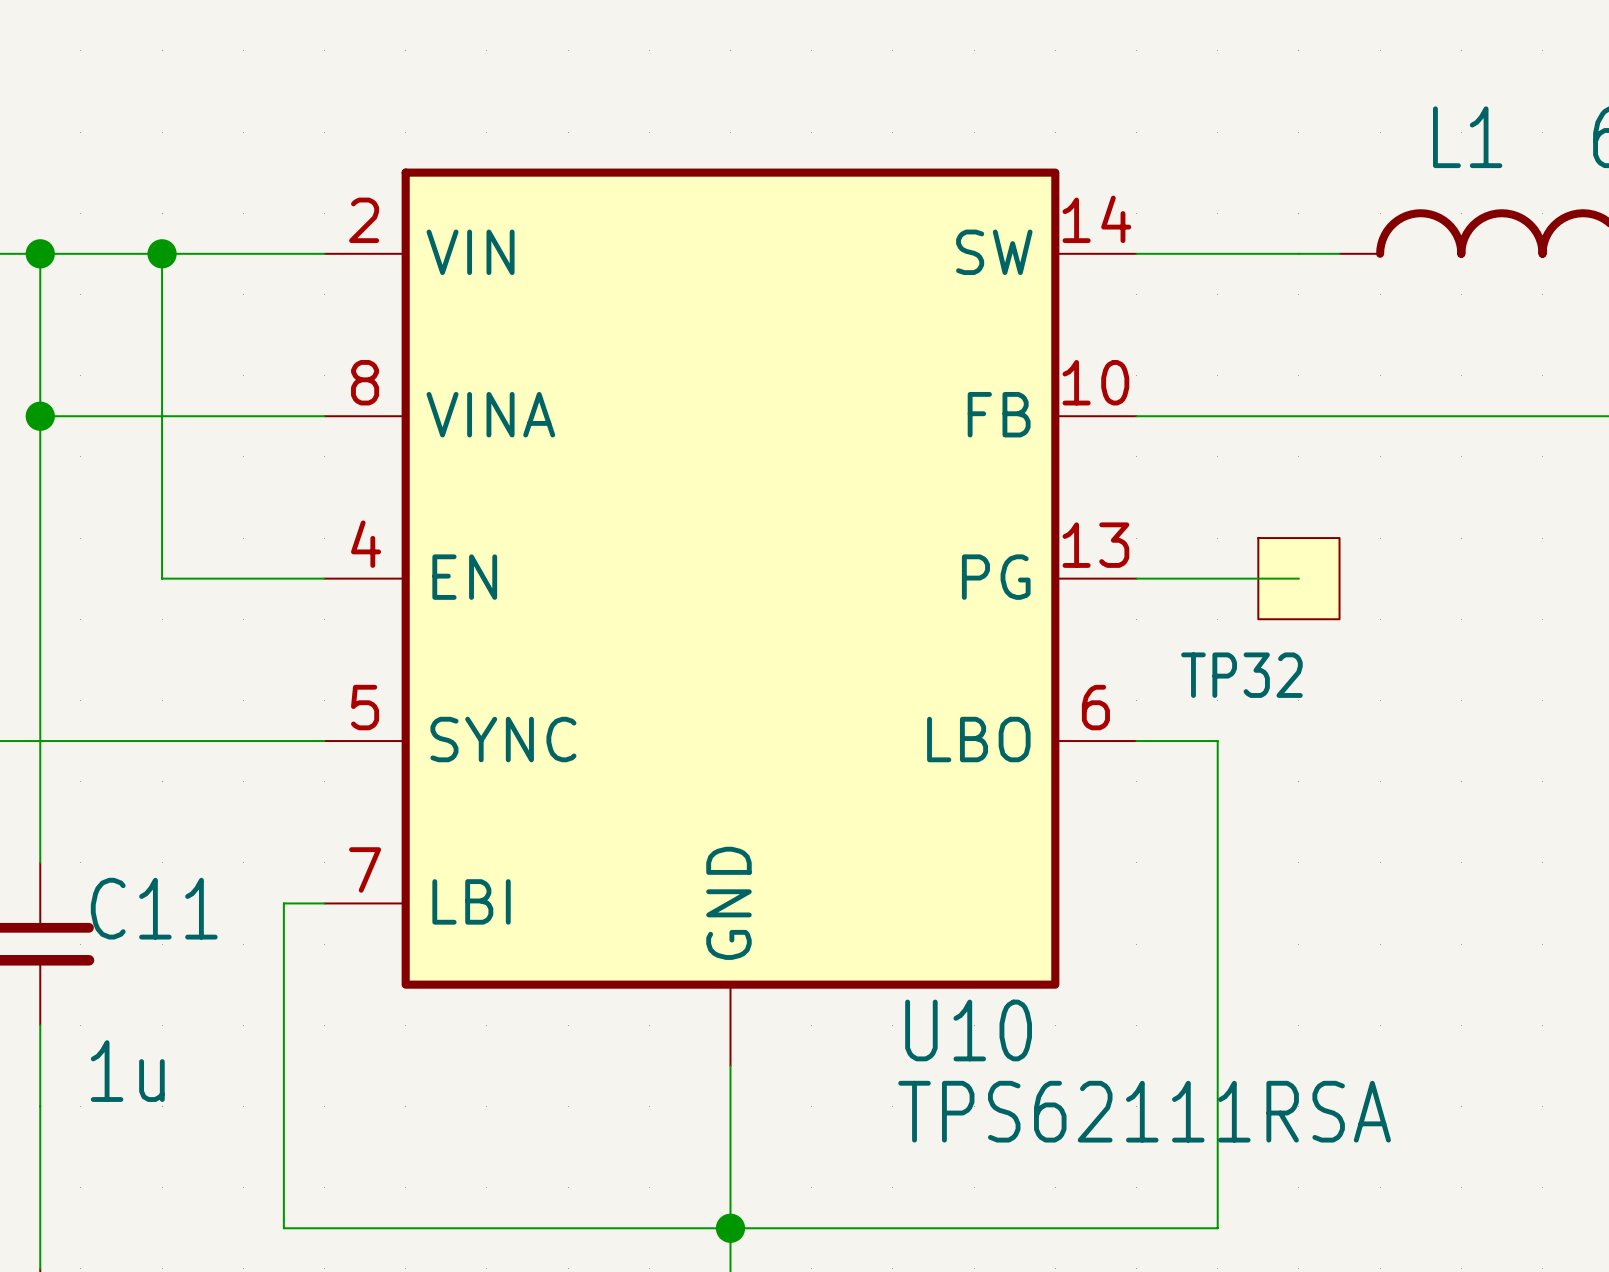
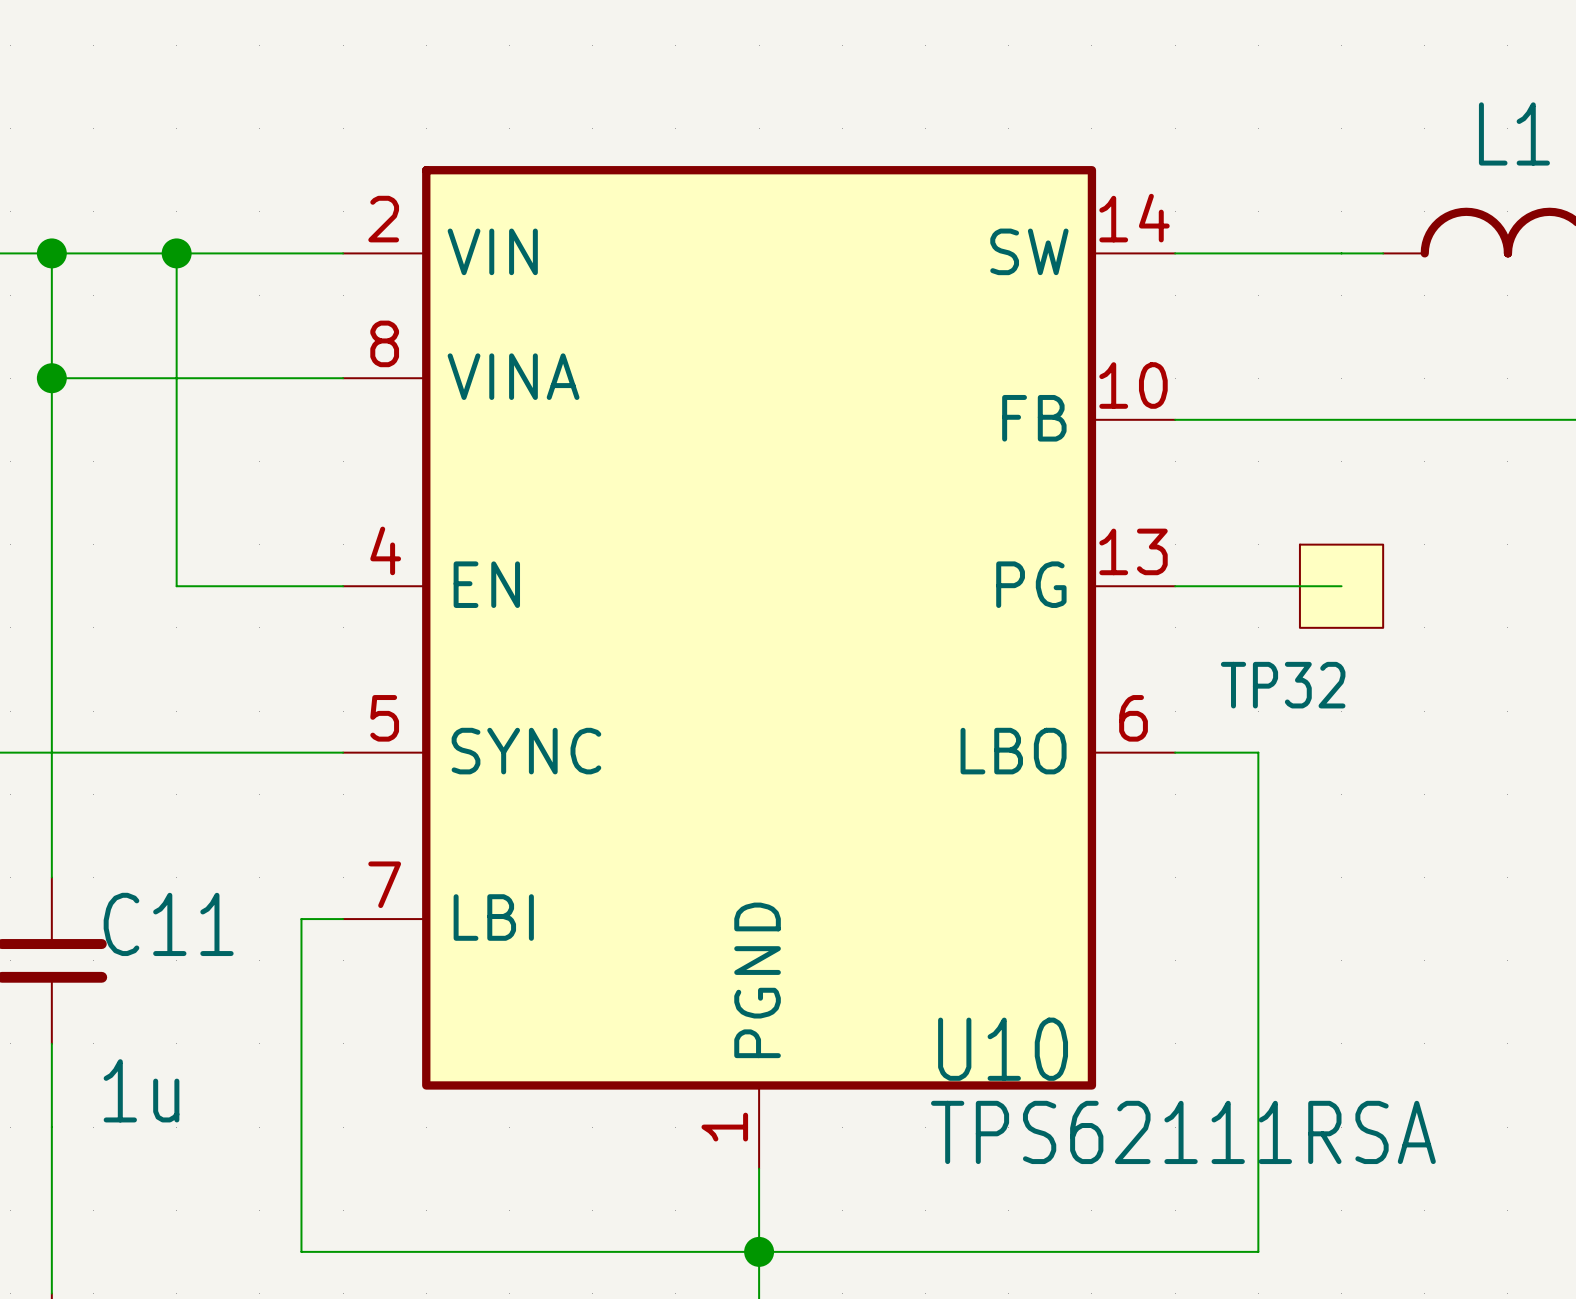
U10 symbol: [324, 168, 1137, 1066] -> [343, 166, 1176, 1169]
wire: (40, 416) (324, 416) -> (51, 378) (343, 378)
junction position: (40, 416) -> (51, 378)

